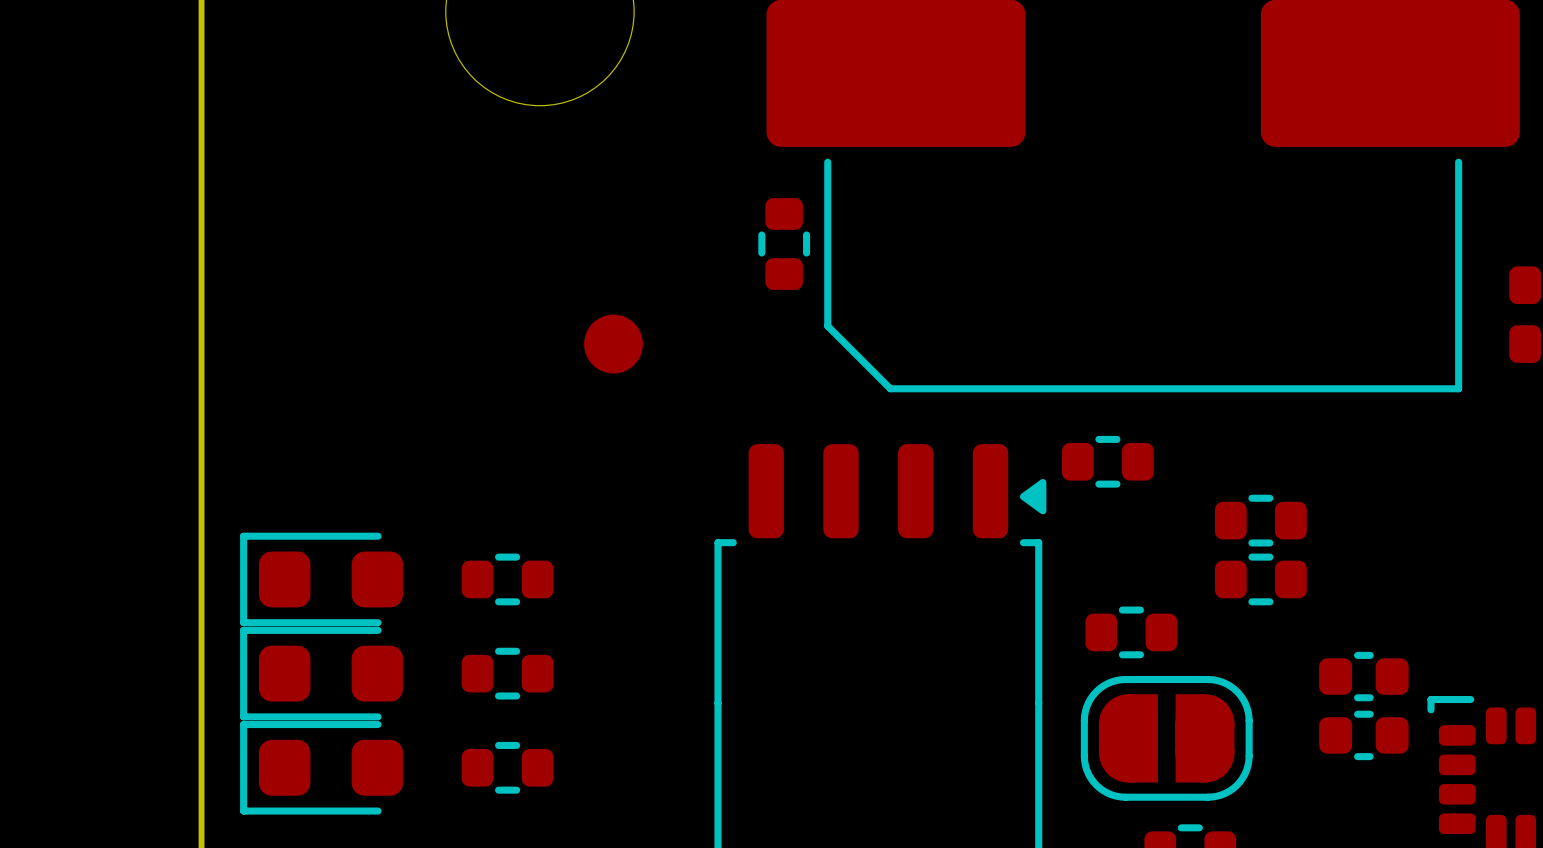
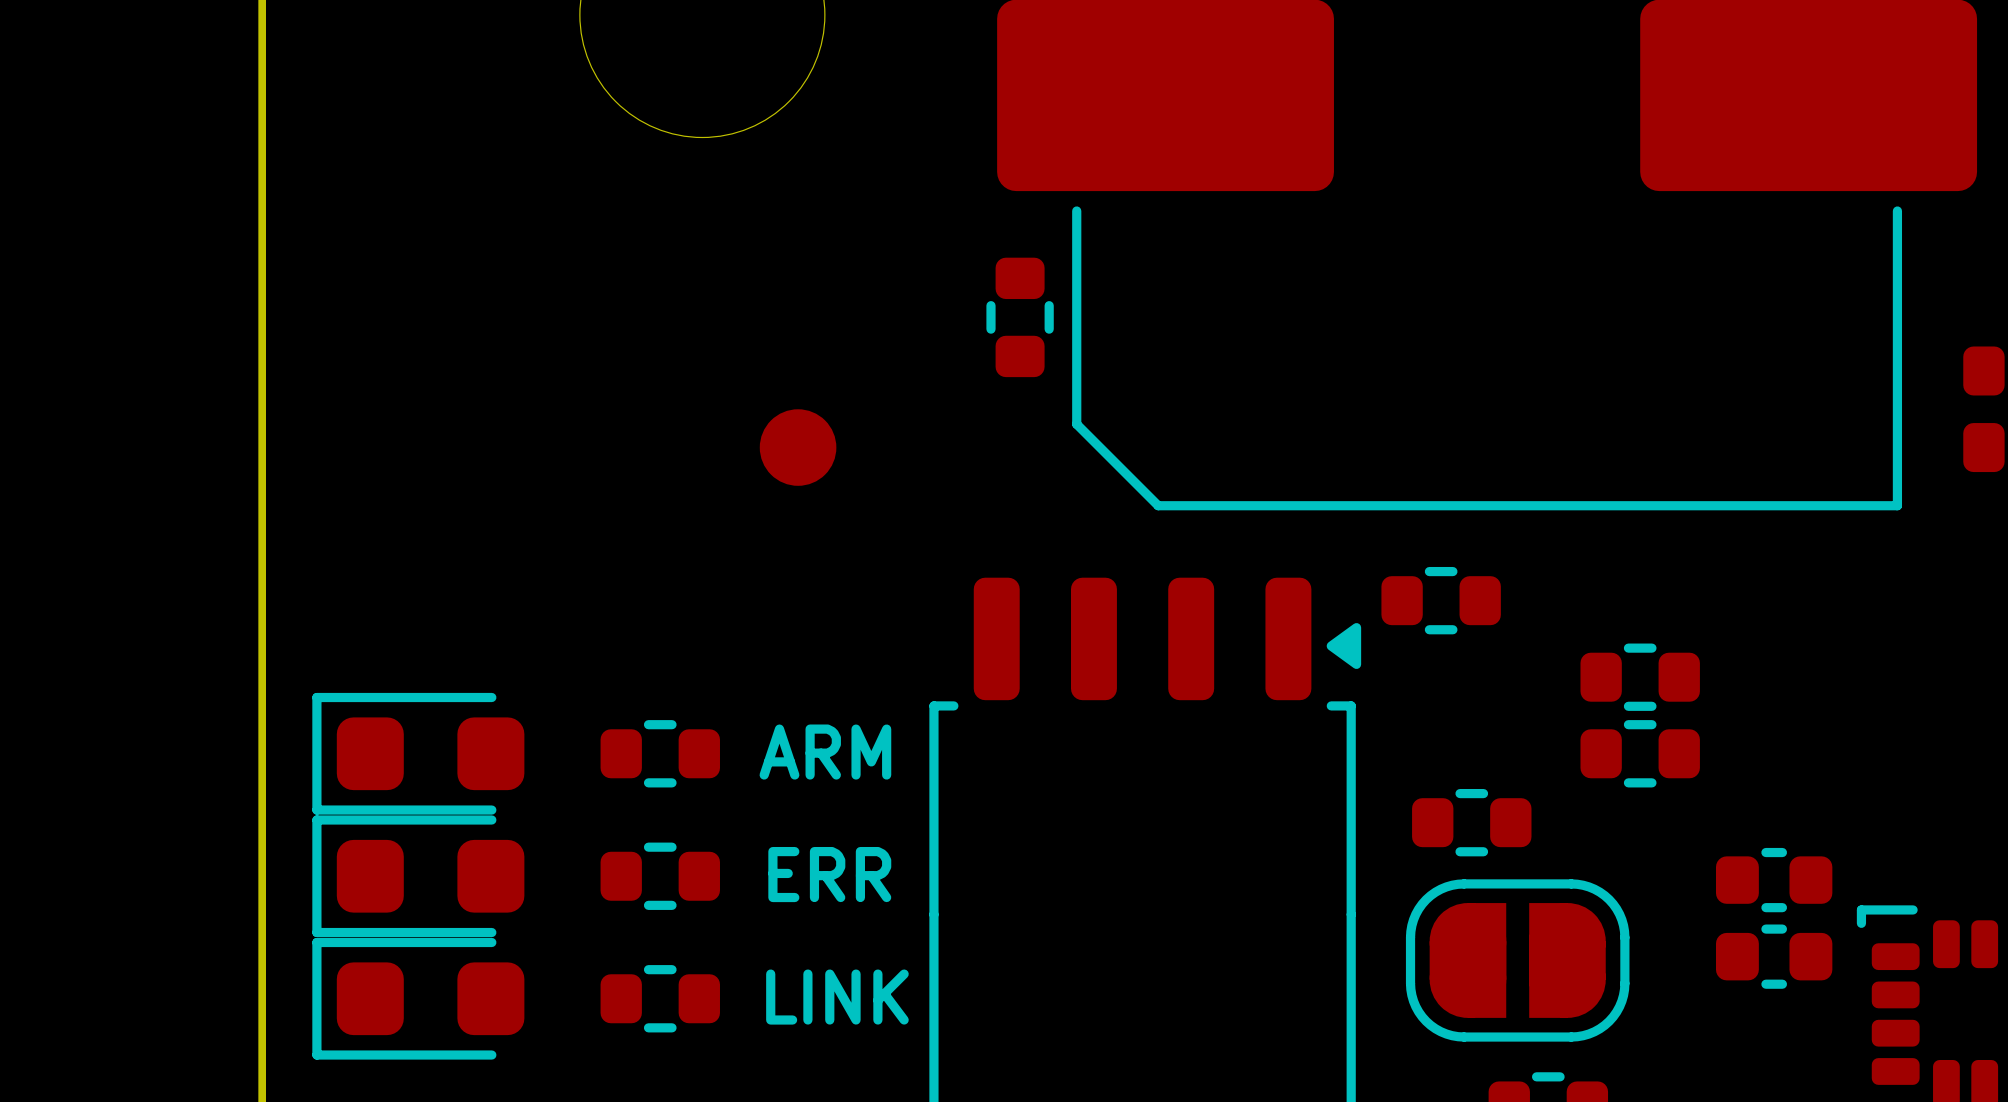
text: none -> ARM (825, 752)
text: none -> ERR (829, 874)
text: none -> LINK (837, 997)

